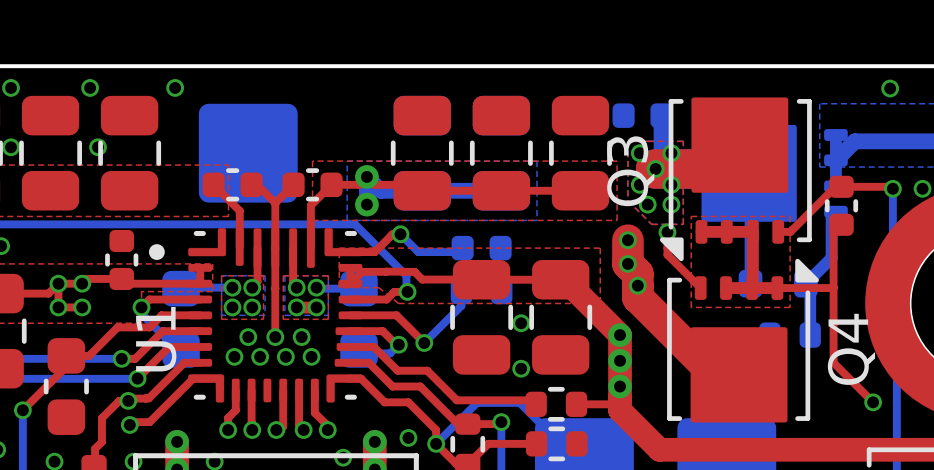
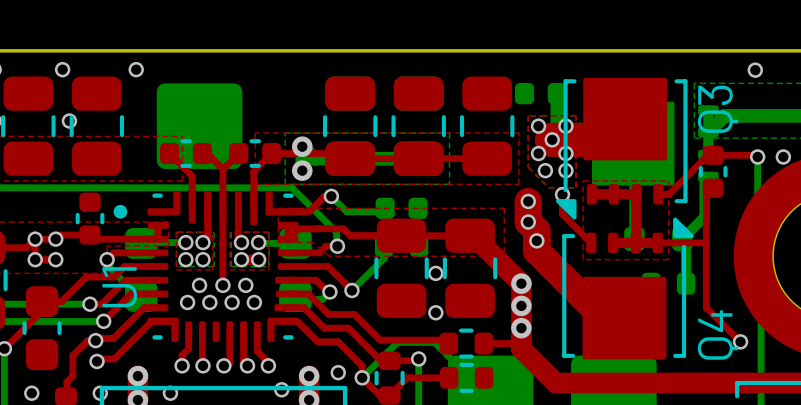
Q3 name position: Q3 (630, 171) -> Q3 (717, 109)
Q4 name position: Q4 (851, 349) -> Q4 (717, 335)

